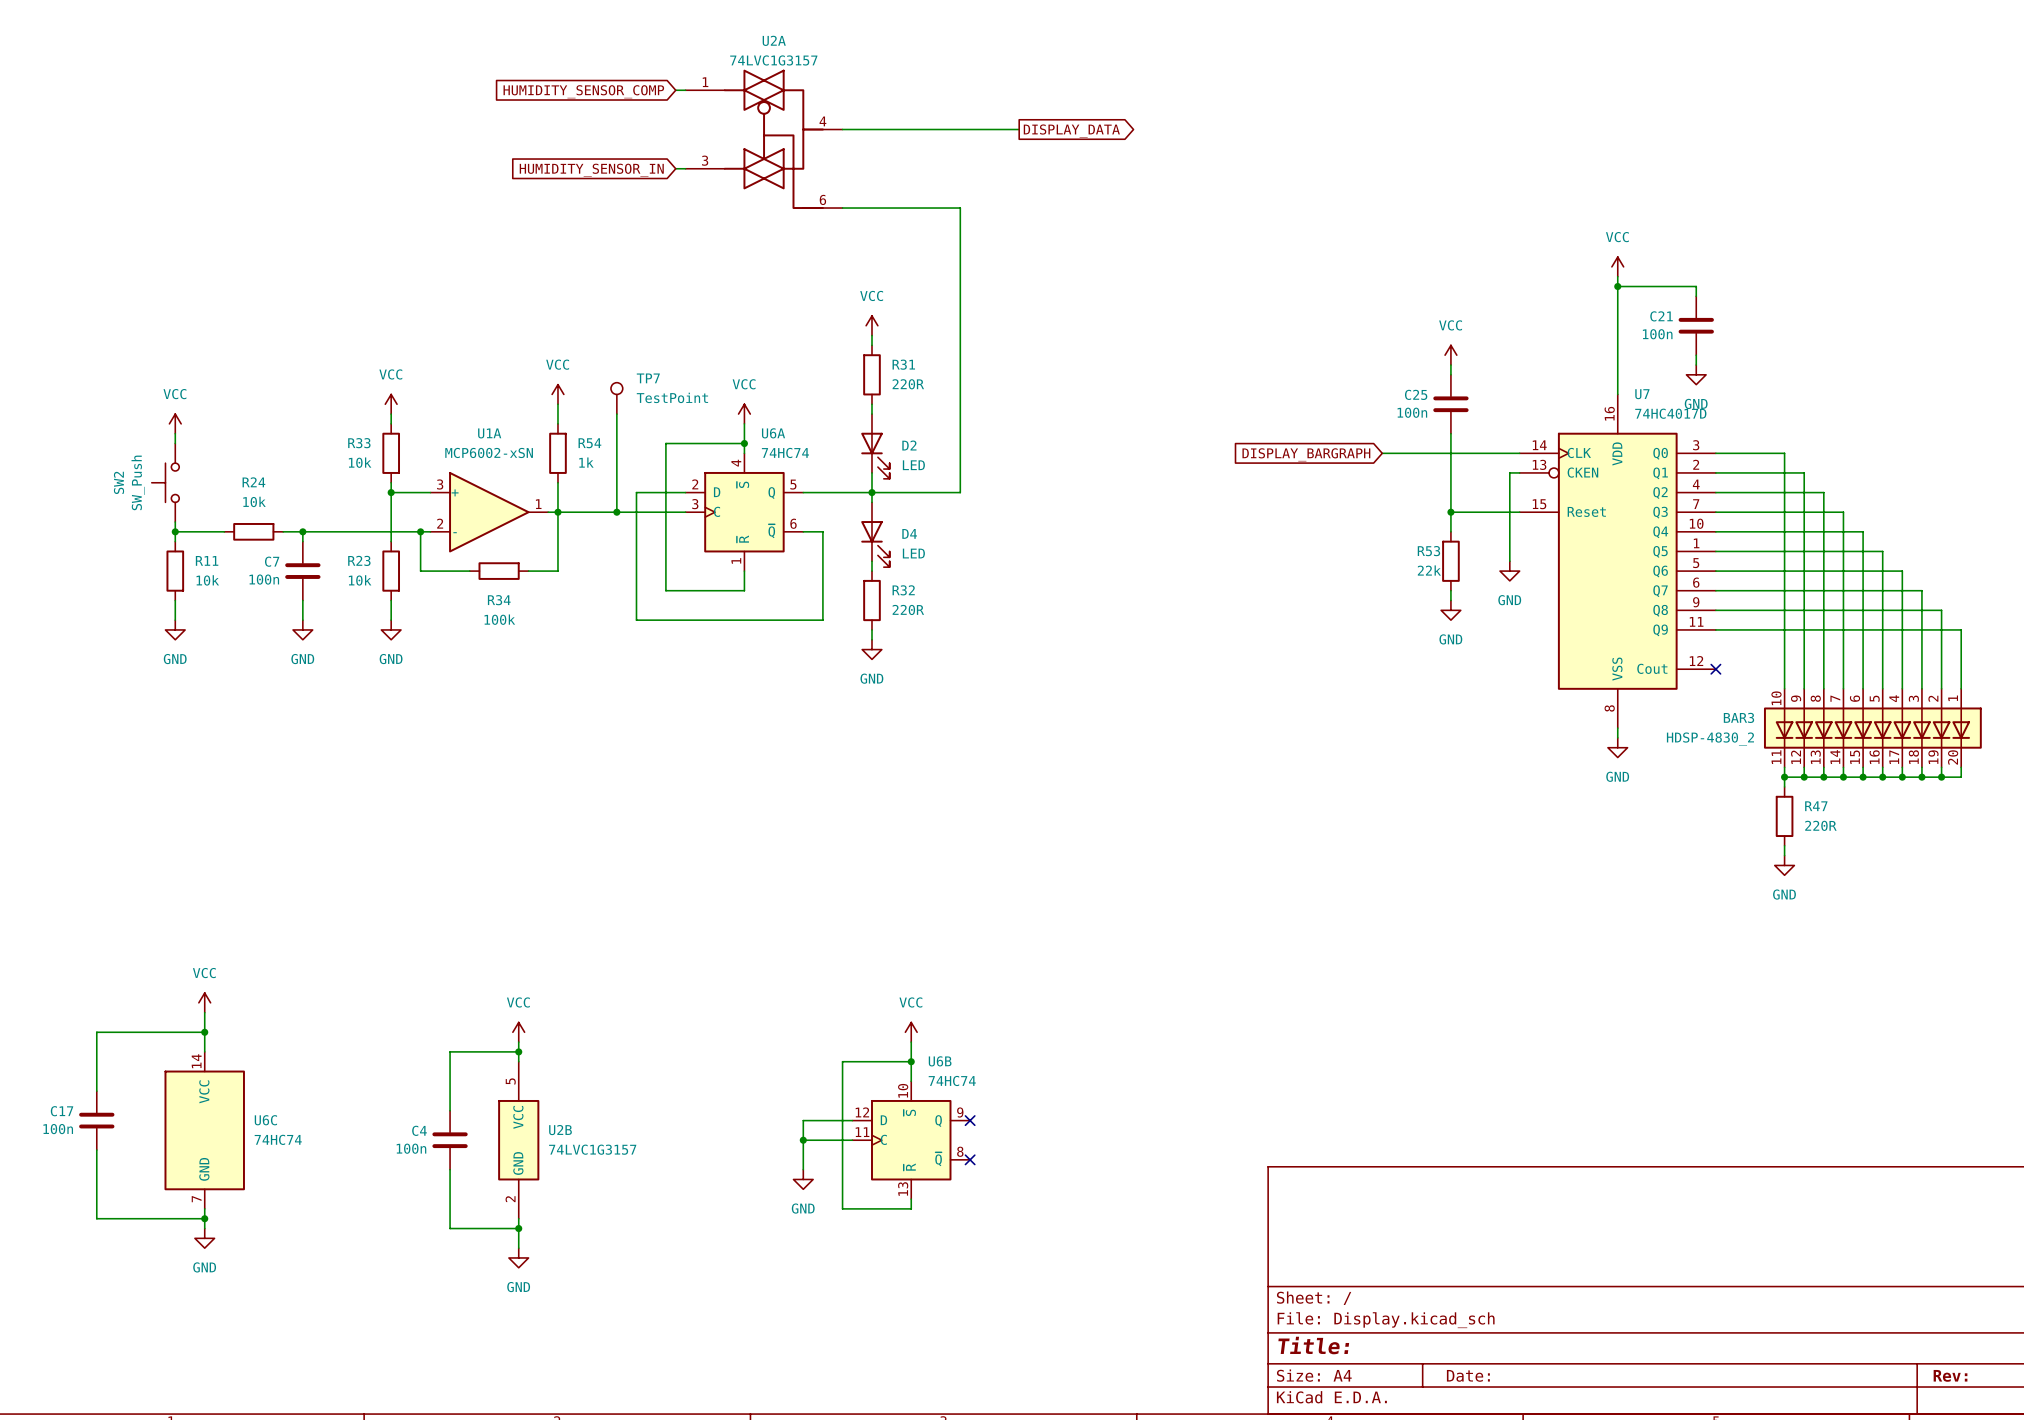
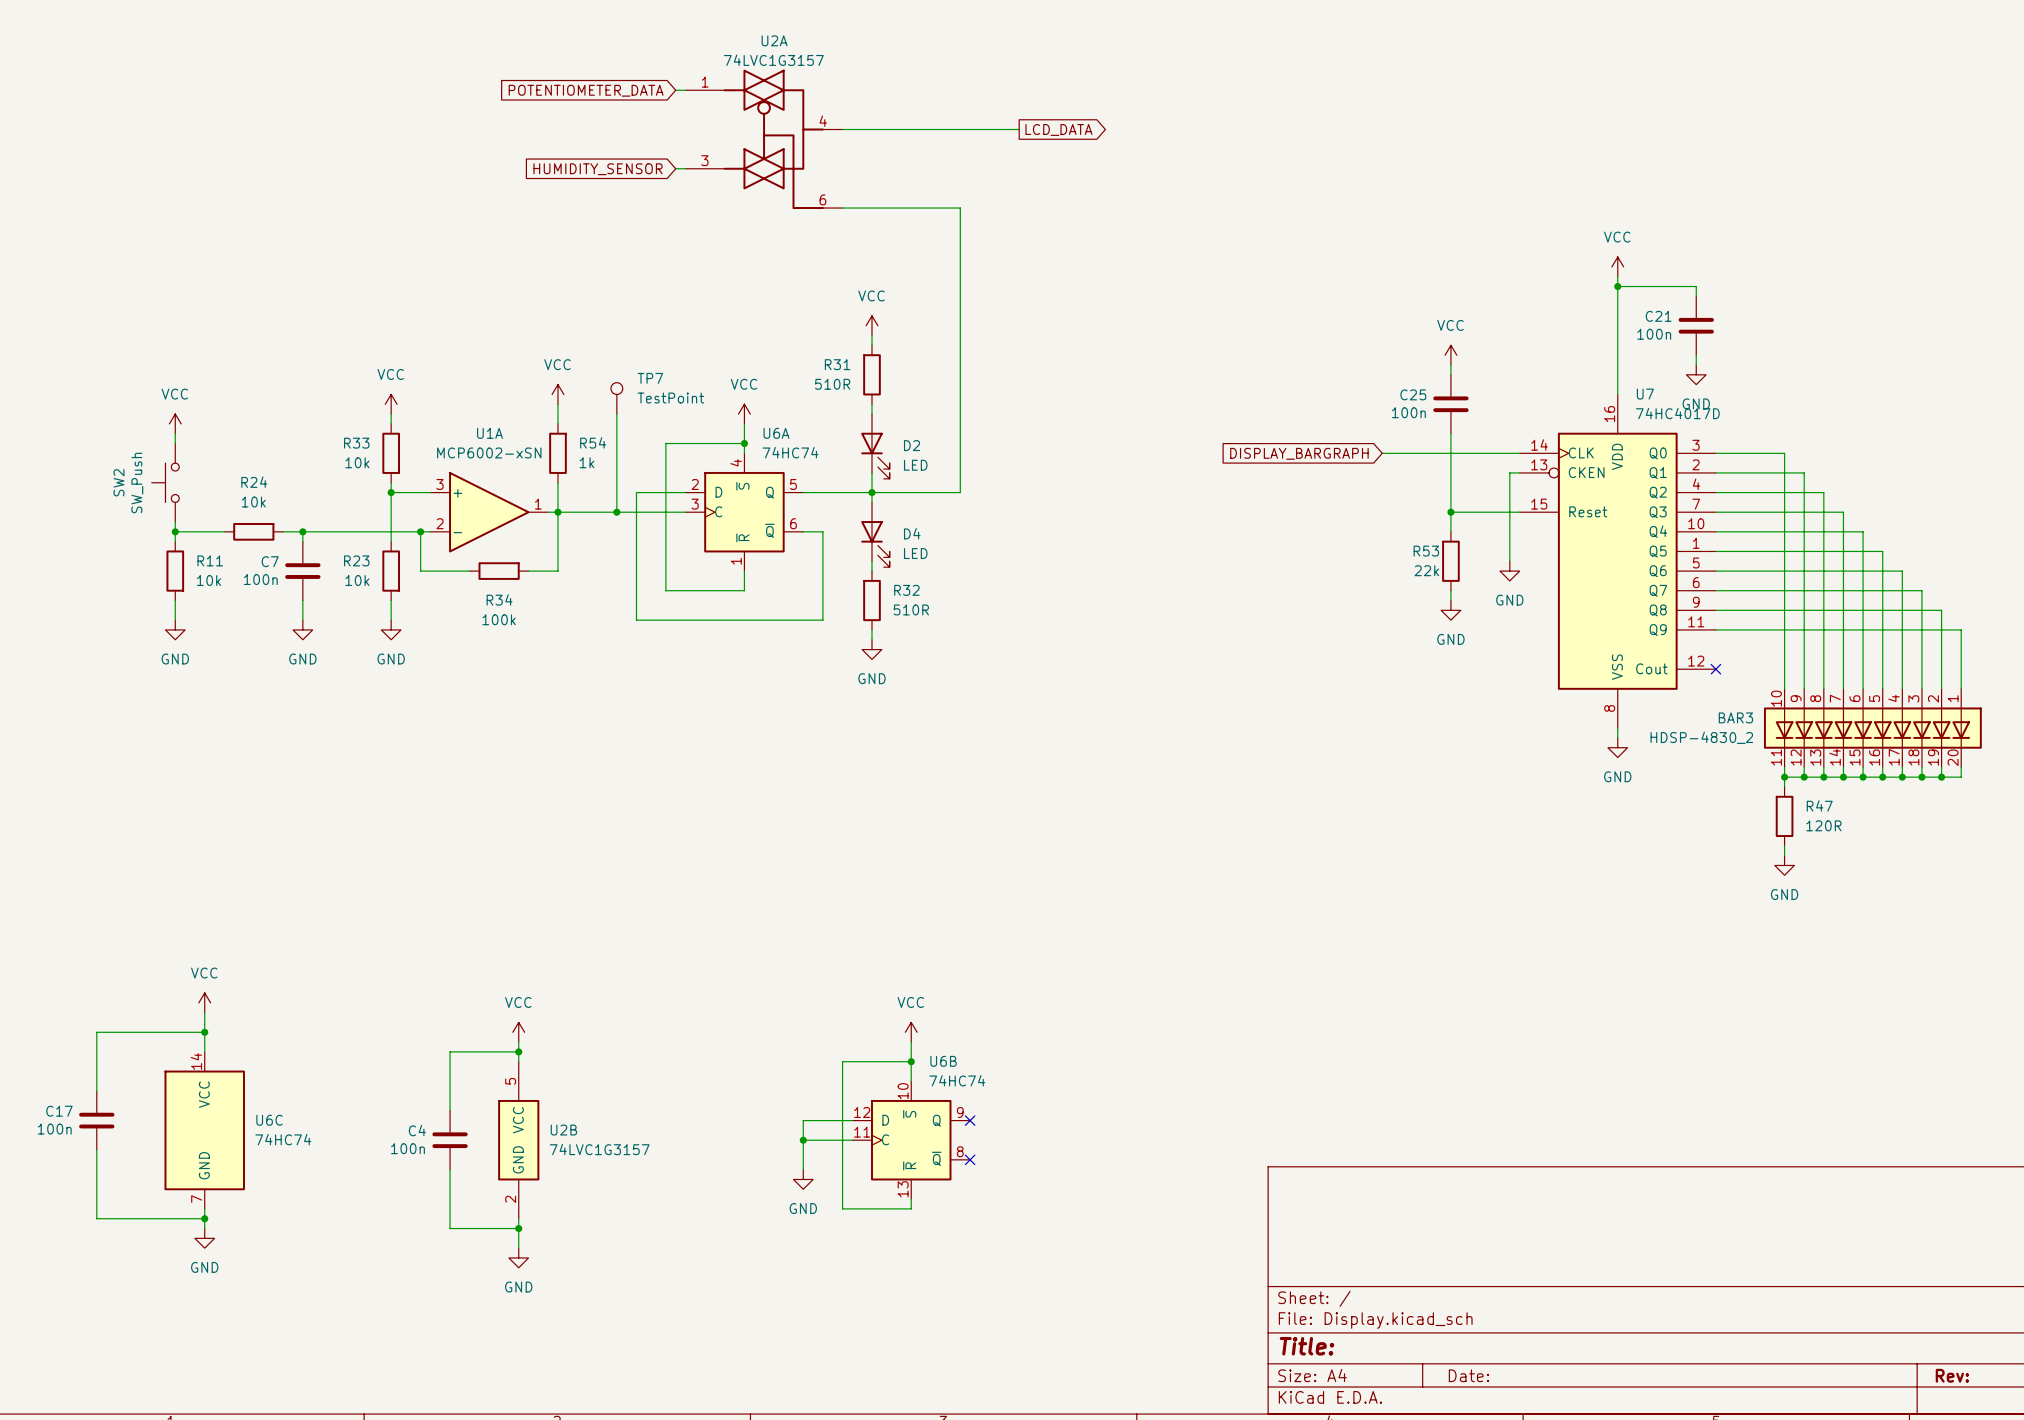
global label: HUMIDITY_SENSOR_COMP (583, 91) -> POTENTIOMETER_DATA (586, 90)
global label: DISPLAY_DATA (1071, 131) -> LCD_DATA (1058, 129)
global label: HUMIDITY_SENSOR_IN (591, 170) -> HUMIDITY_SENSOR (598, 169)
R31 name position: R31 (903, 364) -> R31 (837, 364)
R31 value: 220R (908, 384) -> 510R (832, 384)
R32 value: 220R (908, 609) -> 510R (911, 609)
R47 value: 220R (1820, 825) -> 120R (1823, 825)

